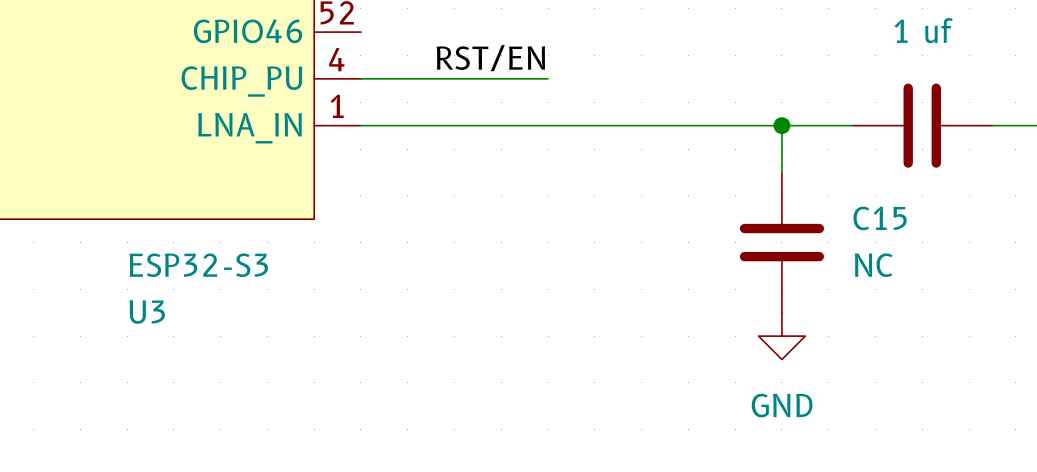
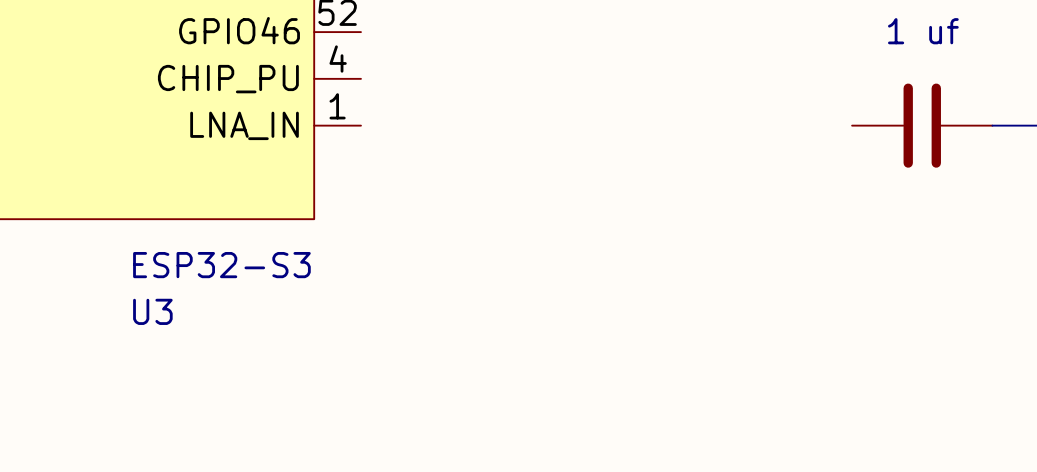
label: RST/EN (490, 58) -> none
wire: (360, 78) (548, 78) -> none
wire: (360, 125) (852, 125) -> none
wire: (781, 125) (781, 172) -> none
junction: (781, 125) -> none
C15: NC (781, 242) -> none
power symbol: GND (781, 336) -> none

